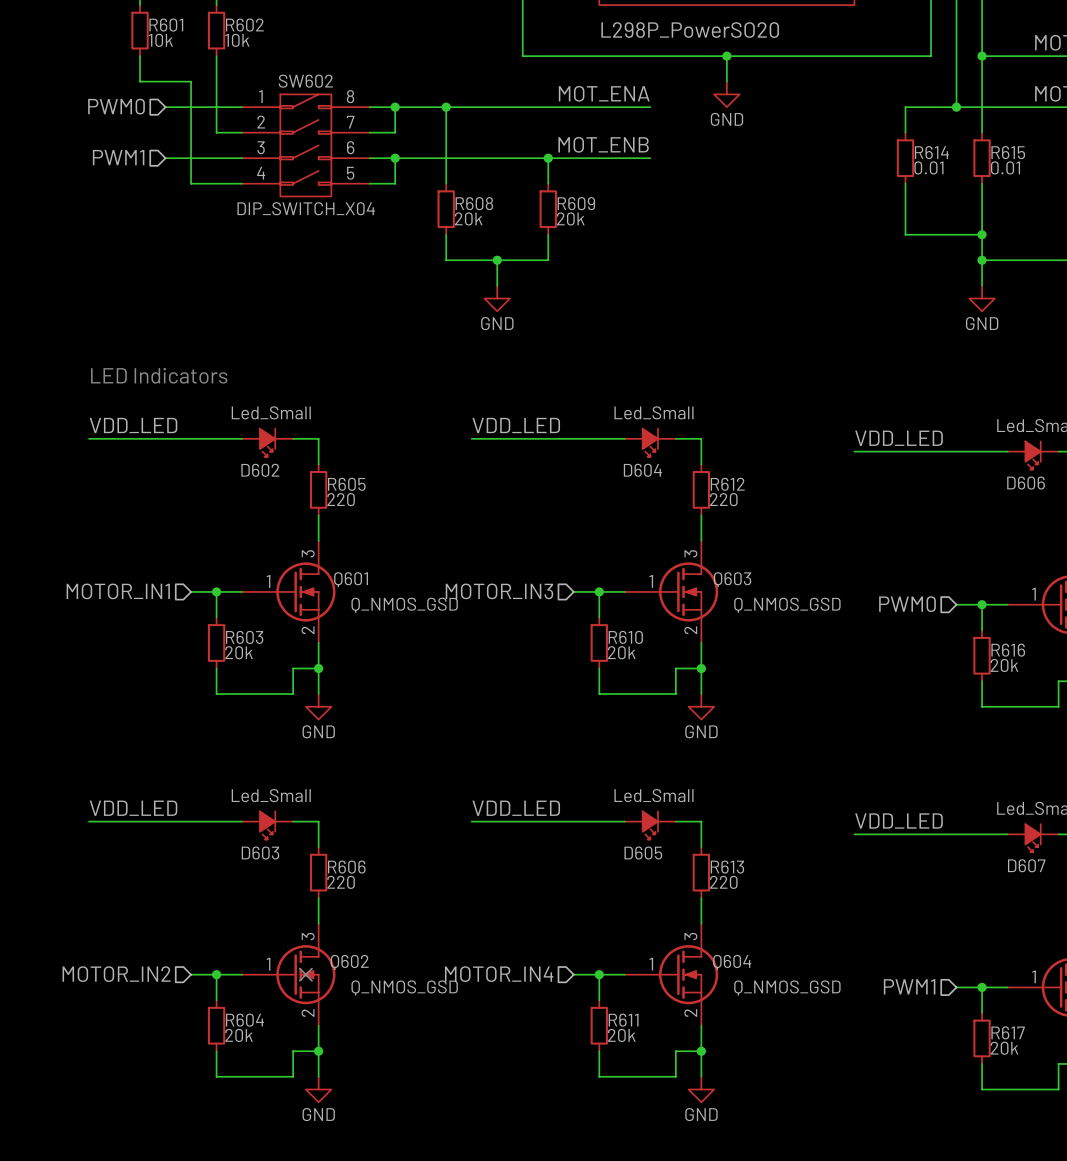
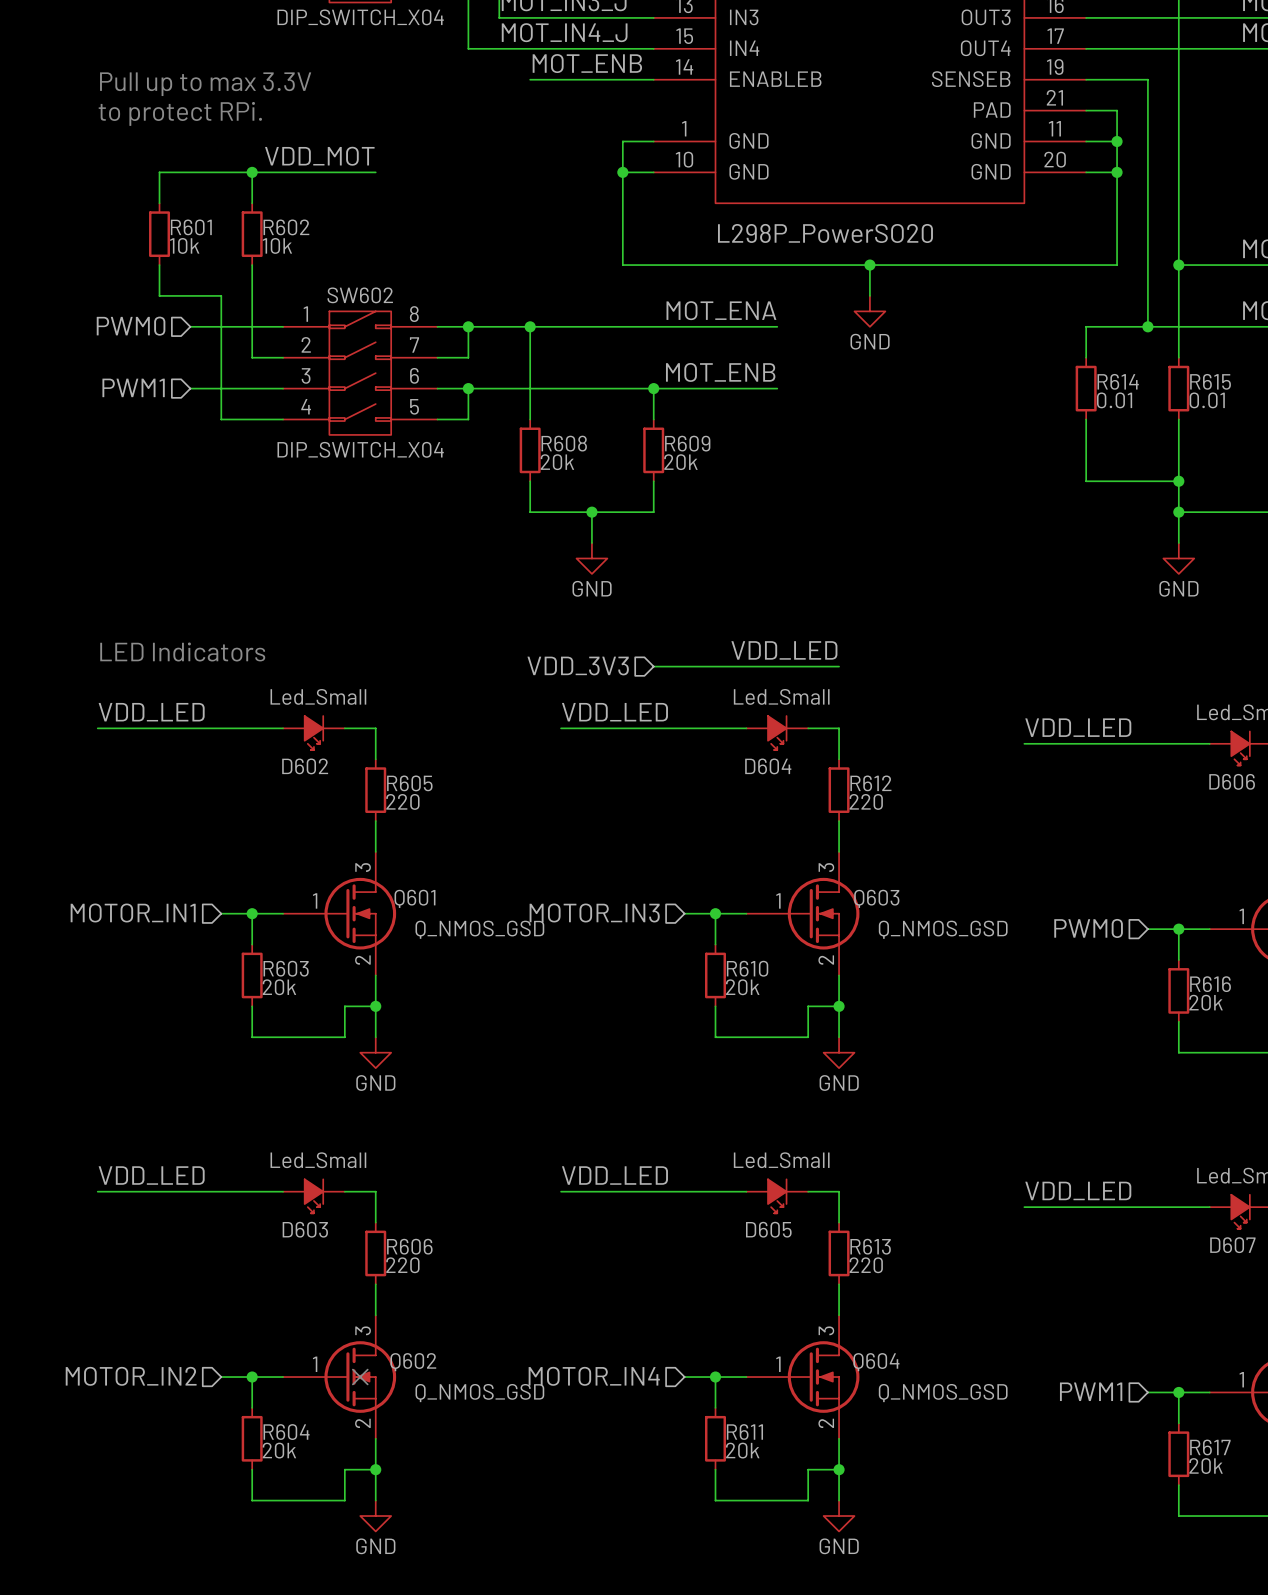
label: none -> VDD_LED (784, 650)
hierarchical label: none -> VDD_3V3 (578, 666)
wire: none -> (653, 666) (839, 666)

